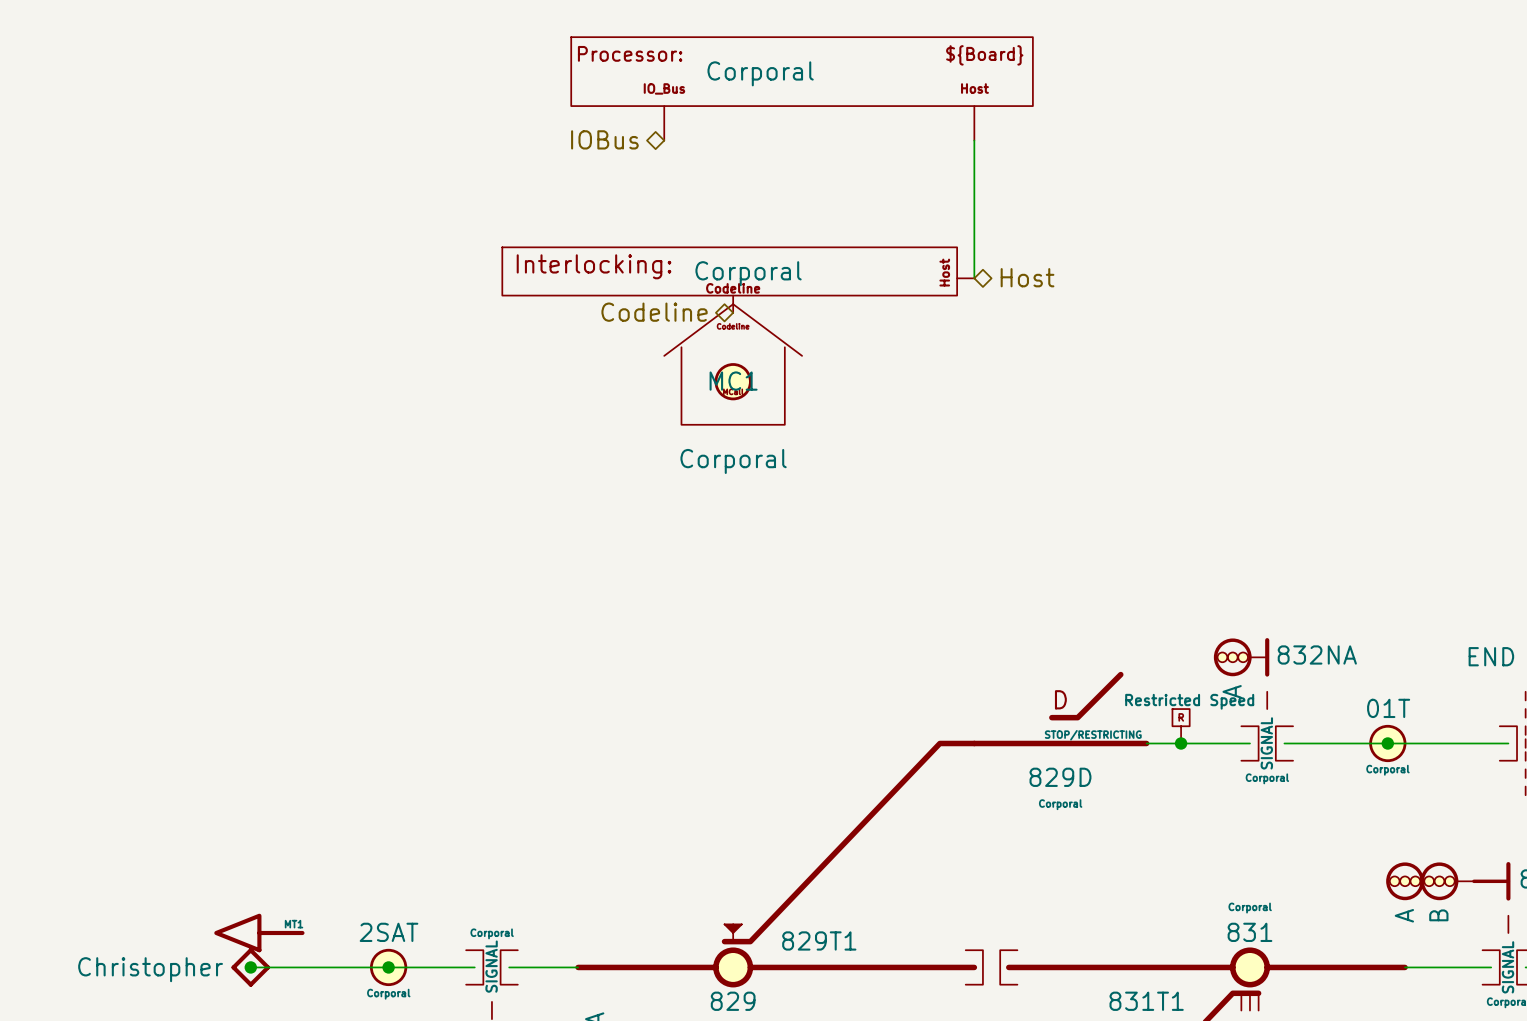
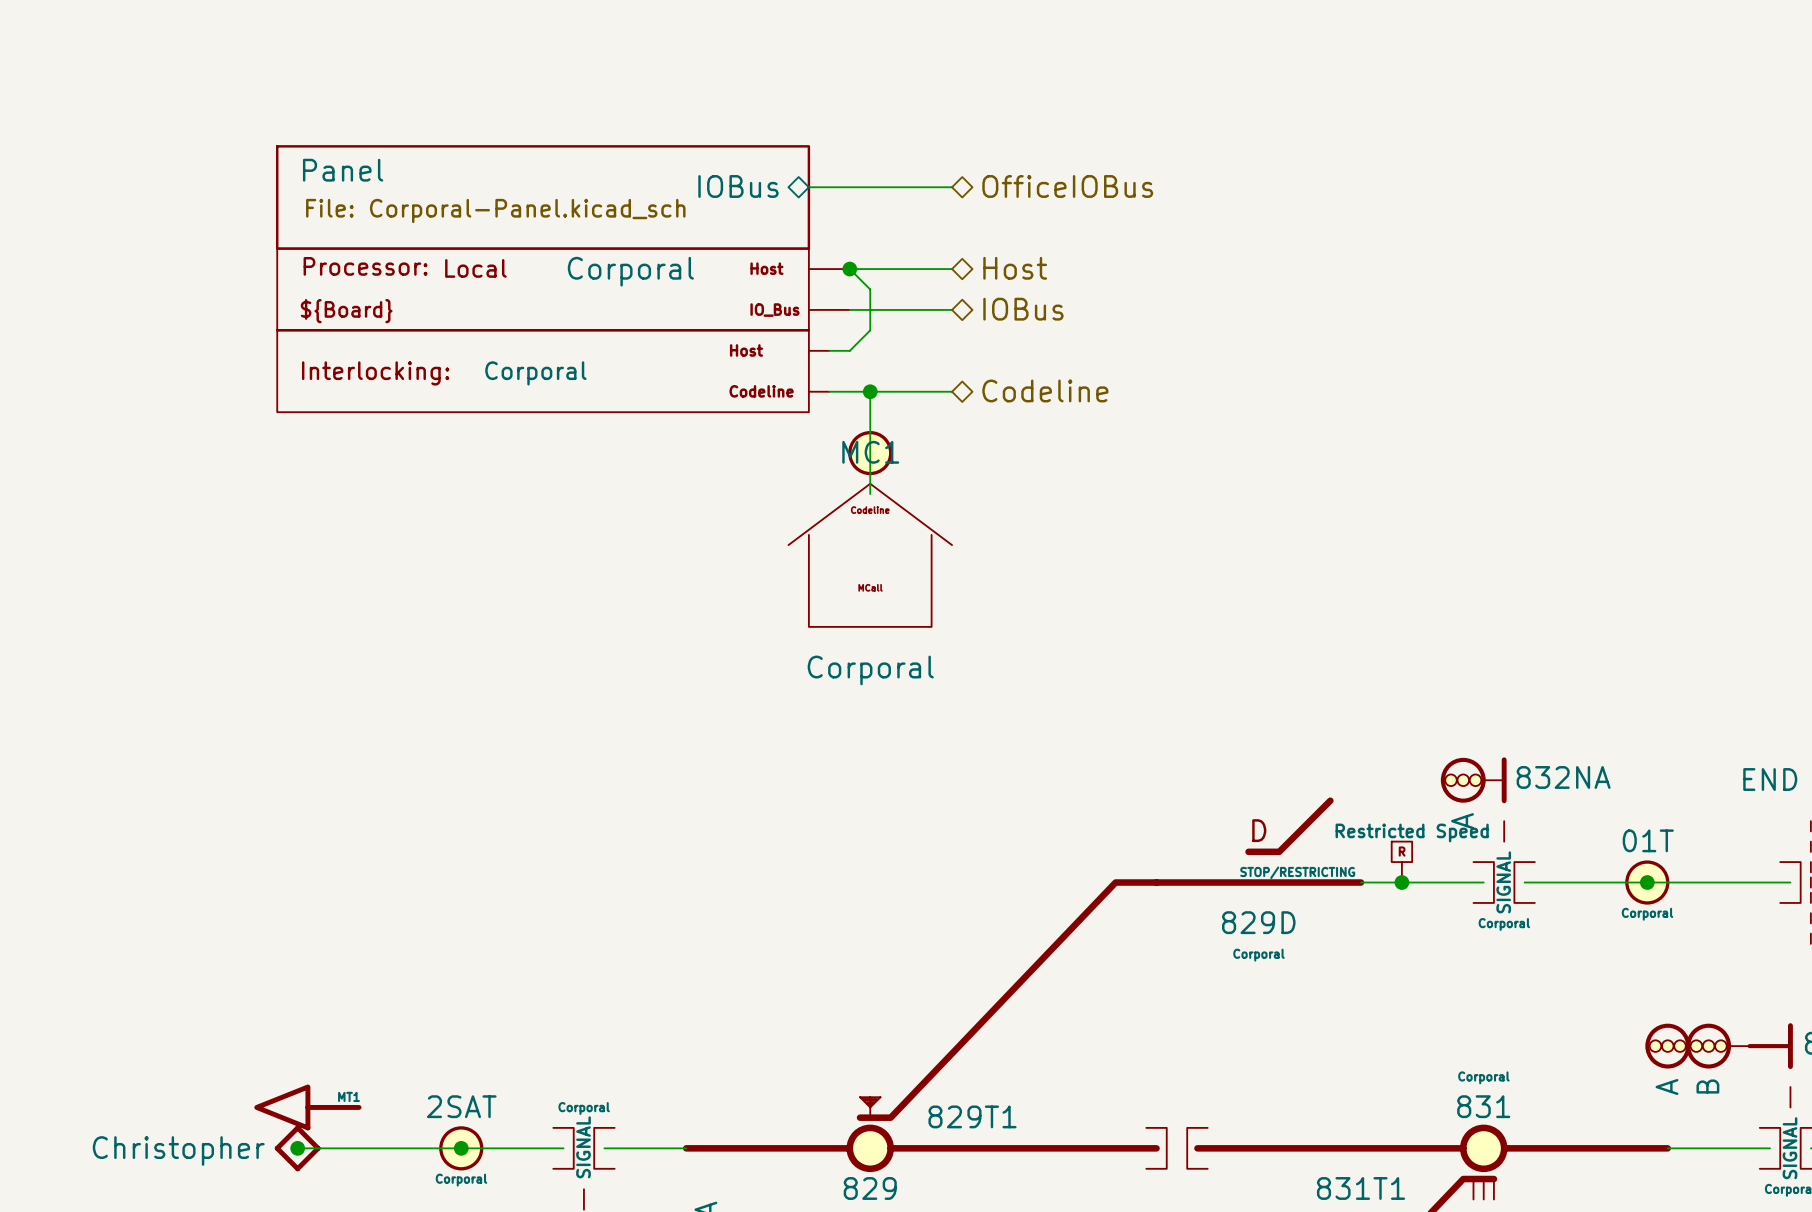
part: Corporal (802, 88) -> none
hierarchical label rotation: 0° (604, 139) -> 180° (1023, 309)
hierarchical label position: IOBus (604, 139) -> IOBus (1023, 309)
wire: (974, 140) (974, 278) -> none
sheet pin: none -> IOBus (738, 186)
wire: none -> (808, 187) (952, 187)
hierarchical label: none -> OfficeIOBus (1067, 186)
sheet Panel: none -> File: Corporal-Panel.kicad_sch (543, 197)
junction: none -> (849, 269)
wire: none -> (952, 269) (849, 269) (870, 289) (870, 330) (849, 350) (829, 350)
part: none -> Corporal (563, 289)
wire: none -> (849, 309) (952, 309)
hierarchical label position: Host (1027, 277) -> Host (1015, 268)
part: Corporal (738, 280) -> none
part: none -> (553, 371)
hierarchical label rotation: 0° (654, 312) -> 180° (1045, 390)
hierarchical label position: Codeline (654, 312) -> Codeline (1045, 390)
wire: none -> (829, 391) (952, 391)
wire: none -> (870, 391) (870, 493)
junction: none -> (870, 391)
part position: (733, 364) -> (870, 555)

